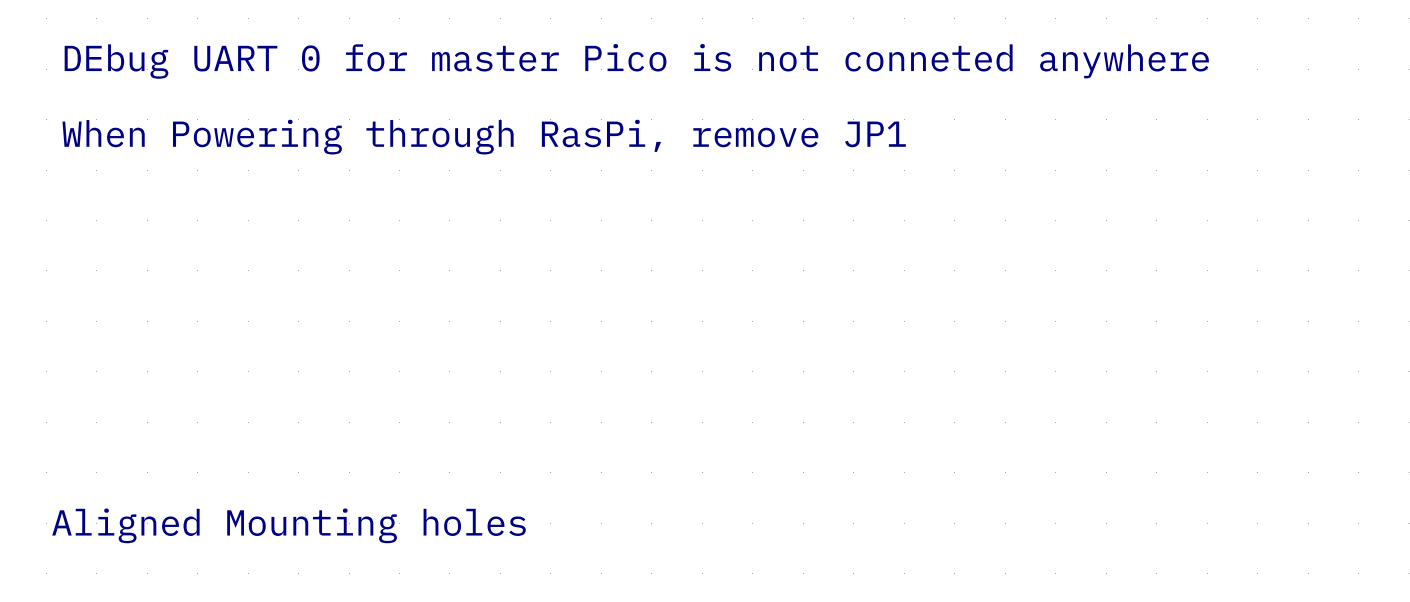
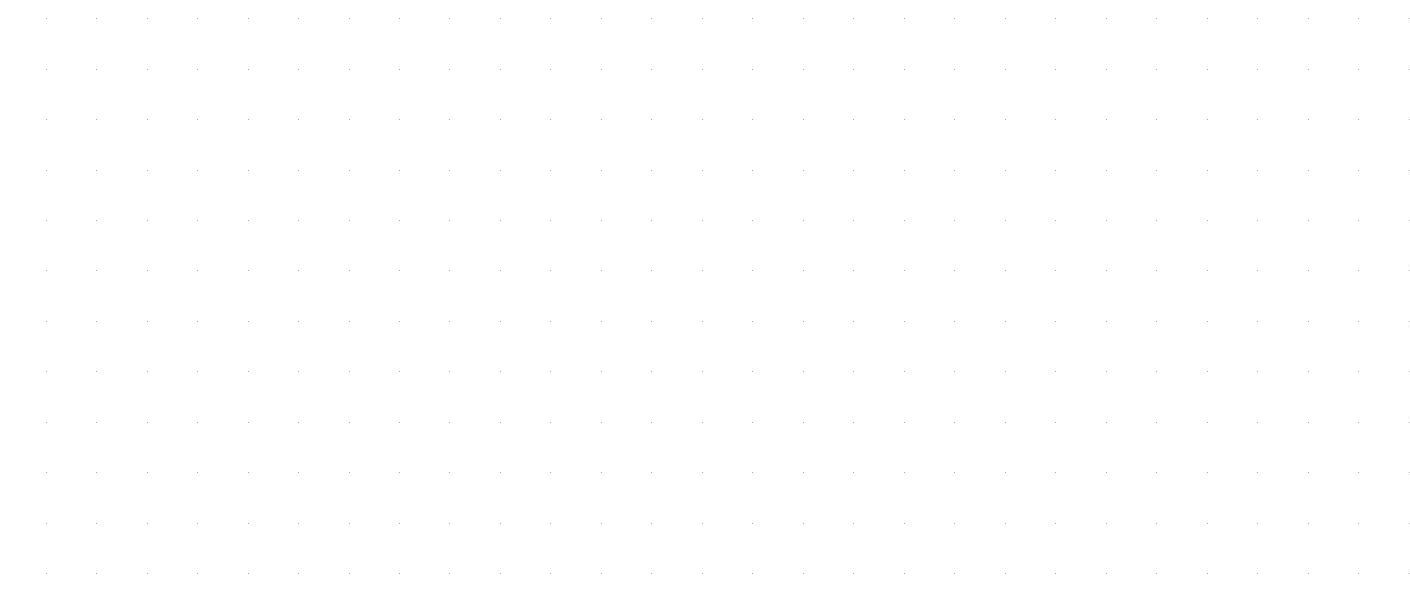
text: DEbug UART 0 for master Pico is not conneted anywhere (636, 61) -> none
text: When Powering through RasPi, remove JP1 (484, 137) -> none
text: Aligned Mounting holes (289, 525) -> none

